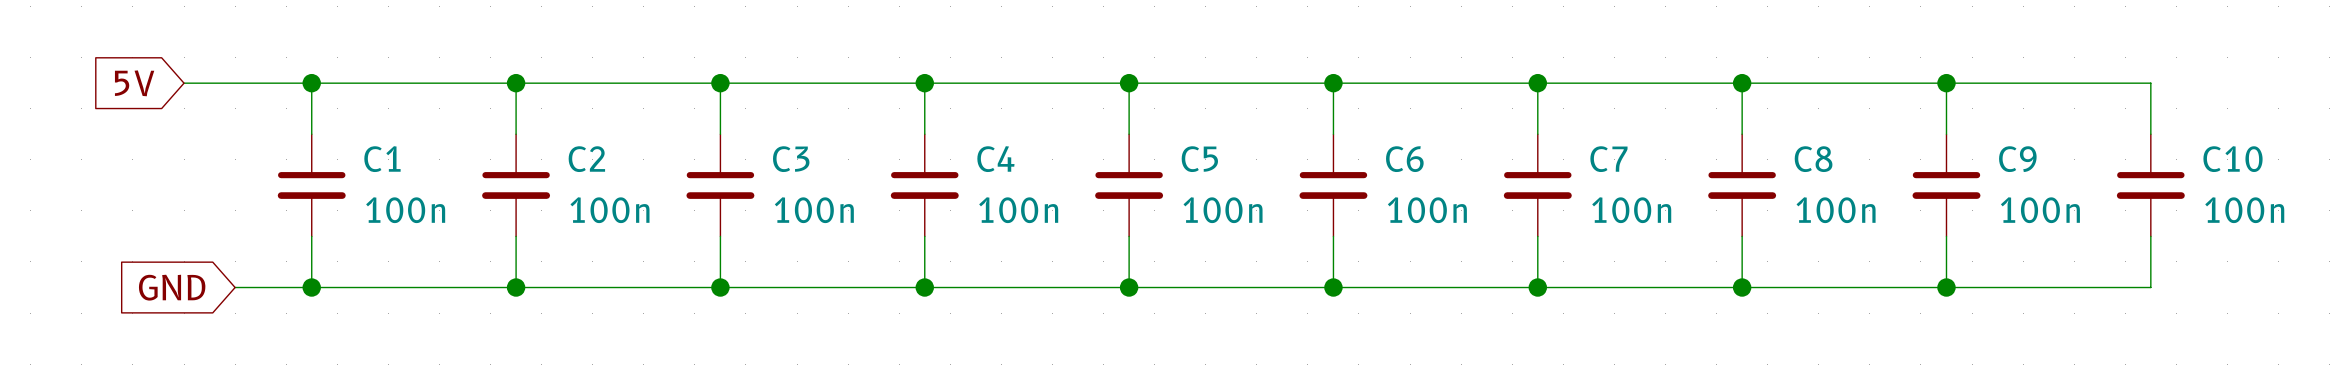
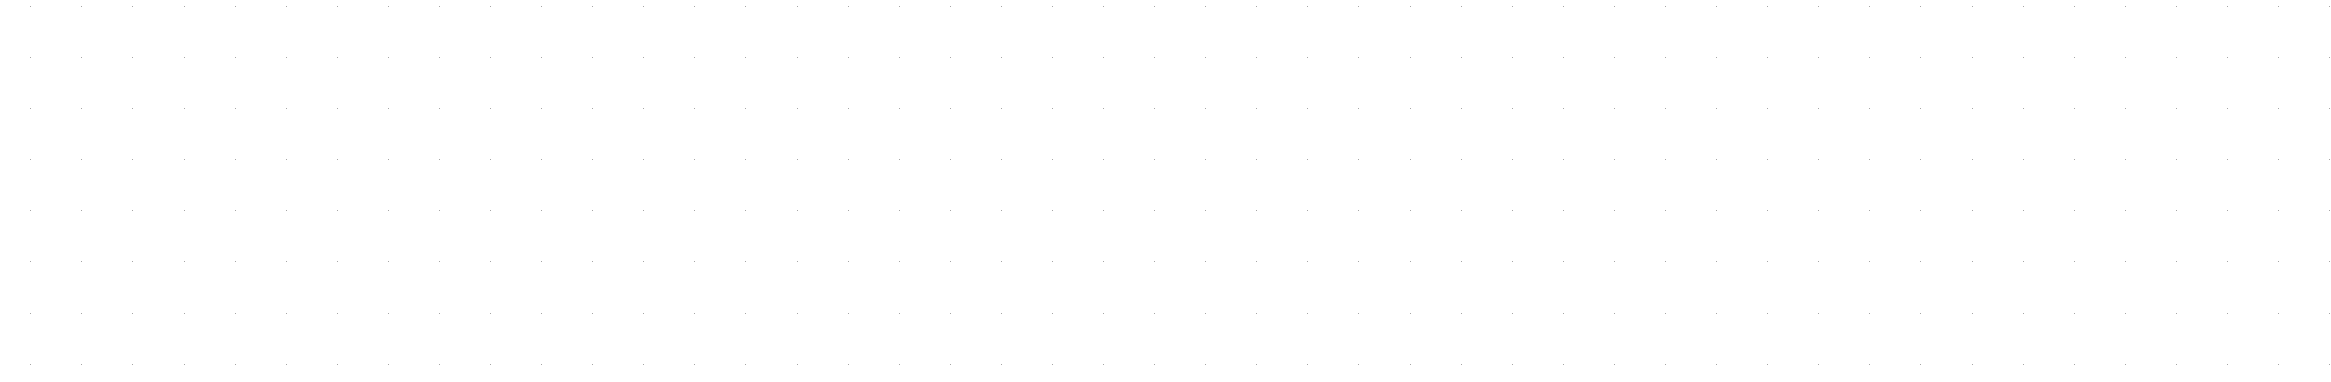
global label: 5V (134, 83) -> none
wire: (184, 83) (2150, 83) (2150, 134) -> none
wire: (311, 83) (311, 134) -> none
junction: (311, 83) -> none
wire: (516, 83) (516, 134) -> none
junction: (516, 83) -> none
wire: (720, 83) (720, 134) -> none
junction: (720, 83) -> none
wire: (924, 83) (924, 134) -> none
junction: (924, 83) -> none
wire: (1129, 83) (1129, 134) -> none
junction: (1129, 83) -> none
wire: (1333, 83) (1333, 134) -> none
junction: (1333, 83) -> none
wire: (1537, 83) (1537, 134) -> none
junction: (1537, 83) -> none
wire: (1742, 83) (1742, 134) -> none
junction: (1742, 83) -> none
wire: (1946, 83) (1946, 134) -> none
junction: (1946, 83) -> none
C1: 100n (311, 185) -> none
C2: 100n (516, 185) -> none
C3: 100n (720, 185) -> none
C4: 100n (924, 185) -> none
C5: 100n (1129, 185) -> none
C6: 100n (1333, 185) -> none
C7: 100n (1537, 185) -> none
C8: 100n (1742, 185) -> none
C9: 100n (1946, 185) -> none
C10: 100n (2150, 185) -> none
wire: (311, 236) (311, 287) -> none
wire: (516, 236) (516, 287) -> none
wire: (720, 236) (720, 287) -> none
wire: (924, 236) (924, 287) -> none
wire: (1129, 236) (1129, 287) -> none
wire: (1333, 236) (1333, 287) -> none
wire: (1537, 236) (1537, 287) -> none
wire: (1742, 236) (1742, 287) -> none
wire: (1946, 236) (1946, 287) -> none
wire: (2150, 236) (2150, 287) (235, 287) -> none
global label: GND (172, 287) -> none
junction: (311, 287) -> none
junction: (516, 287) -> none
junction: (720, 287) -> none
junction: (924, 287) -> none
junction: (1129, 287) -> none
junction: (1333, 287) -> none
junction: (1537, 287) -> none
junction: (1742, 287) -> none
junction: (1946, 287) -> none

